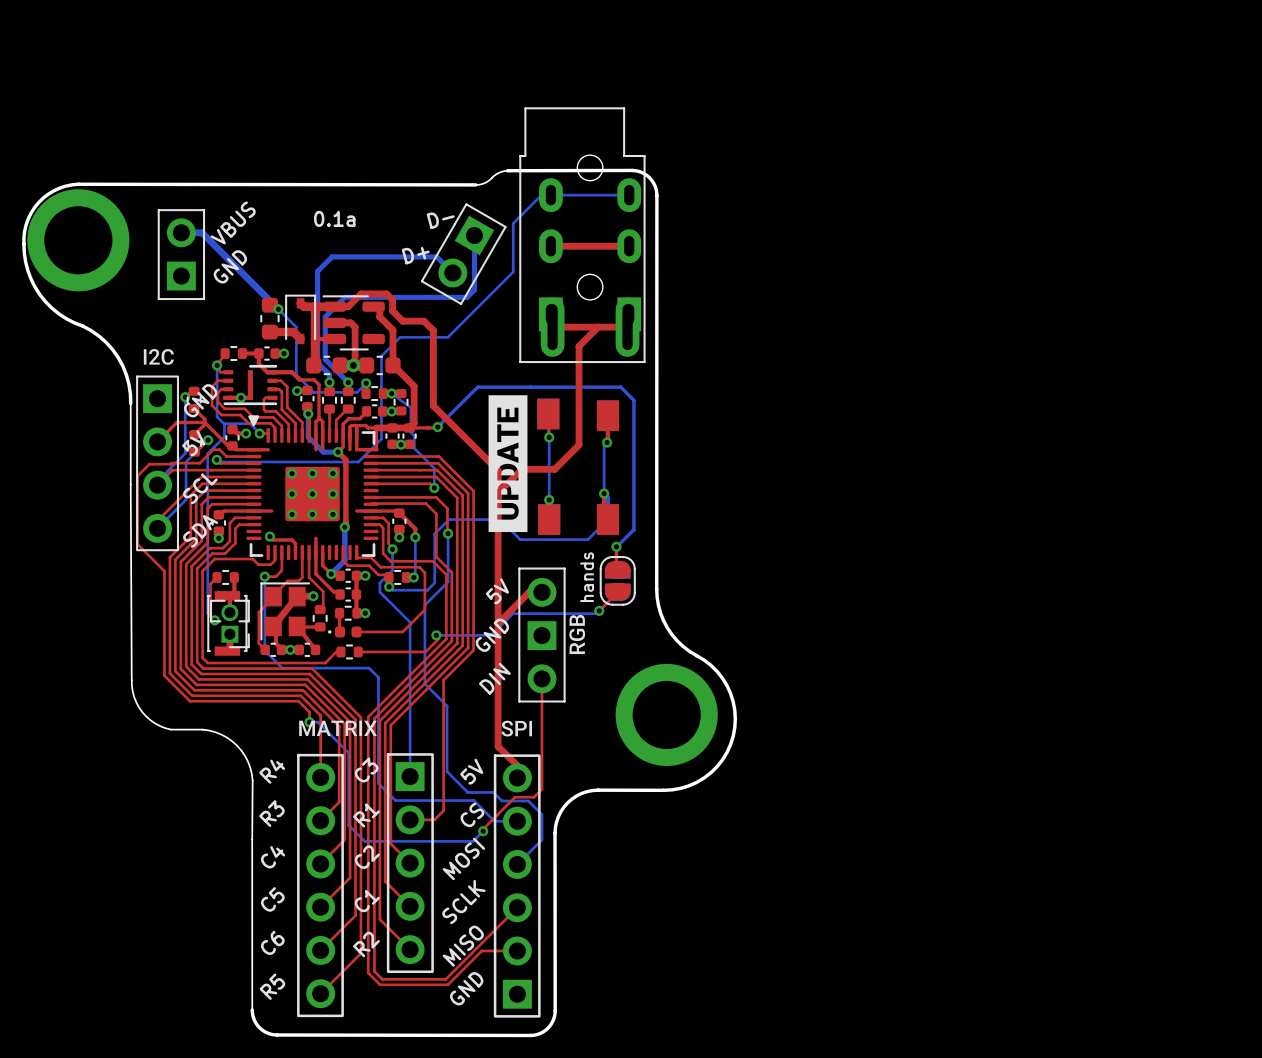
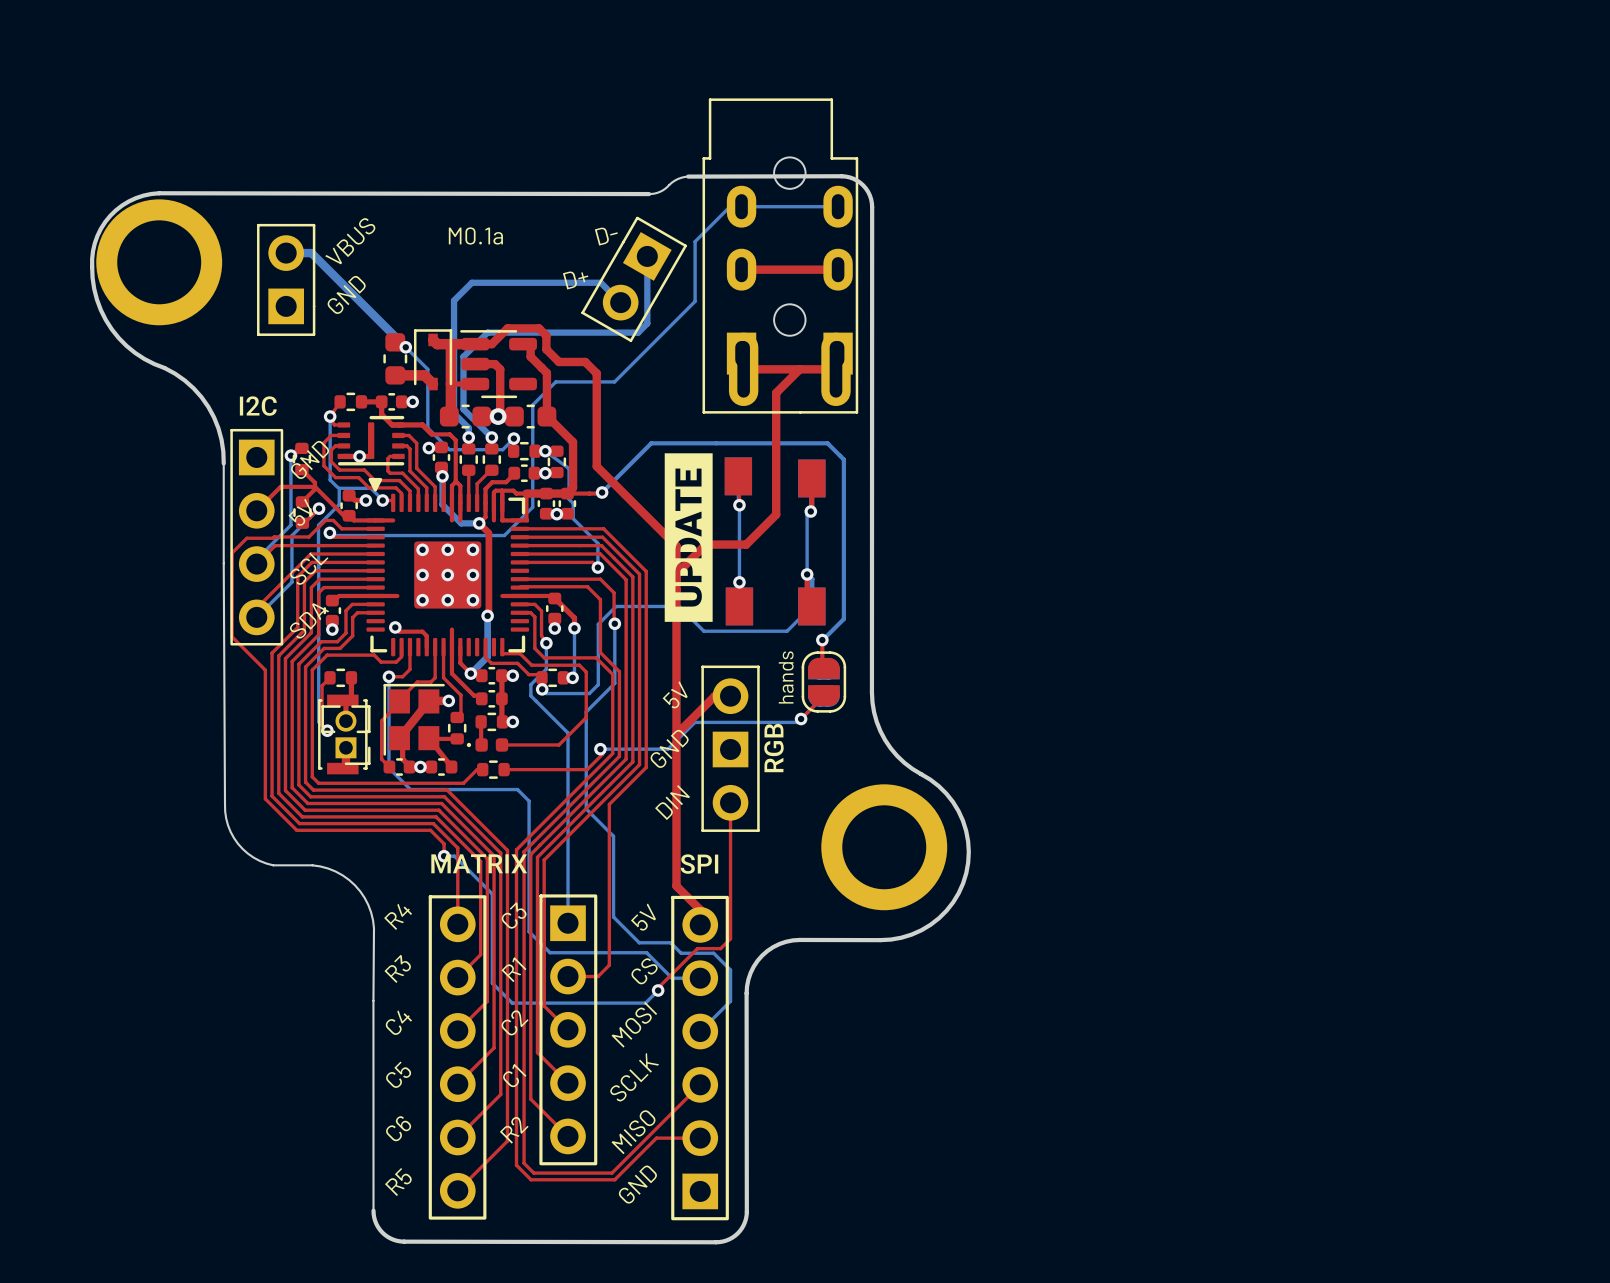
text: 0.1a (334, 218) -> M0.1a (475, 235)

